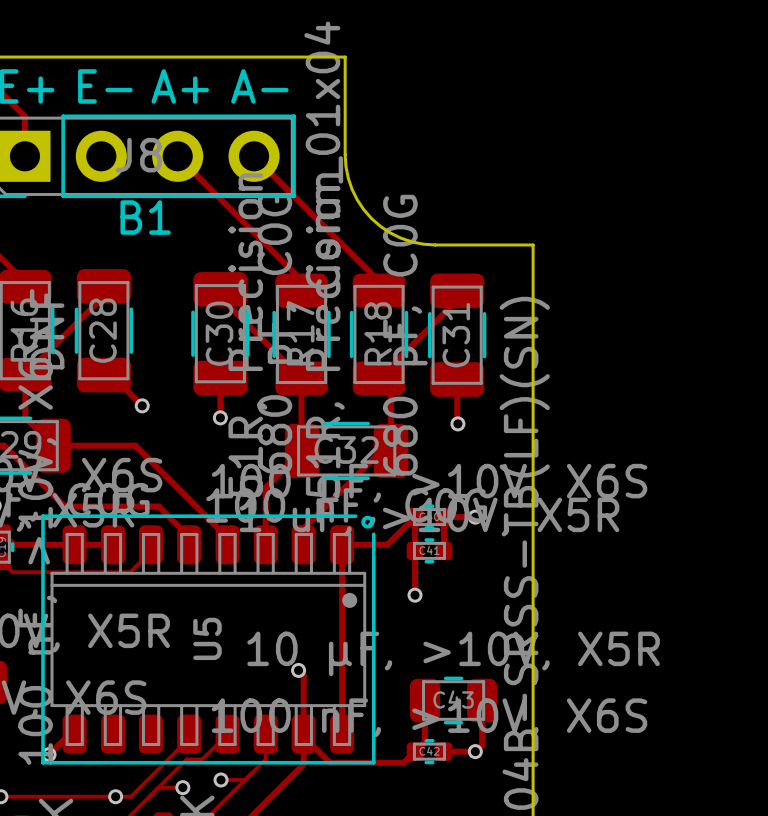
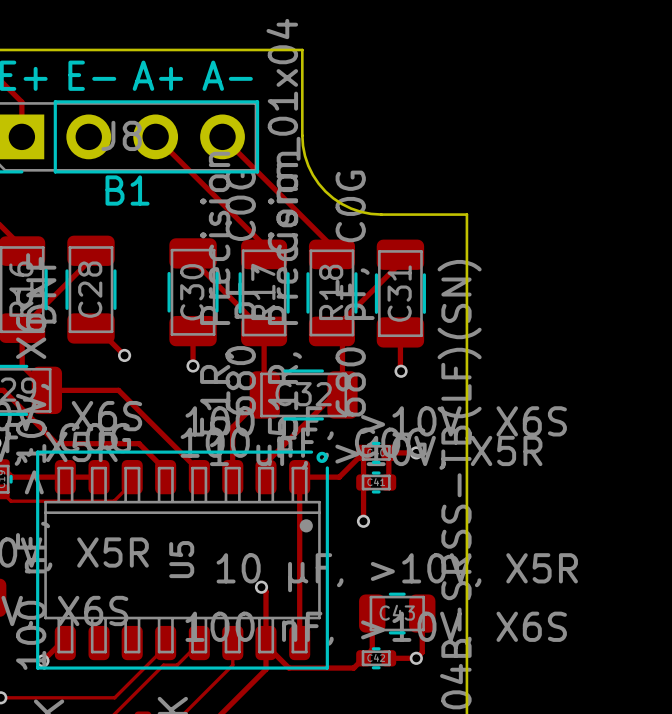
track: (221, 779) (245, 779) -> none
via: (221, 779) -> none
track: (158, 787) (182, 787) -> none
via: (182, 787) -> none
via: (115, 796) -> none

